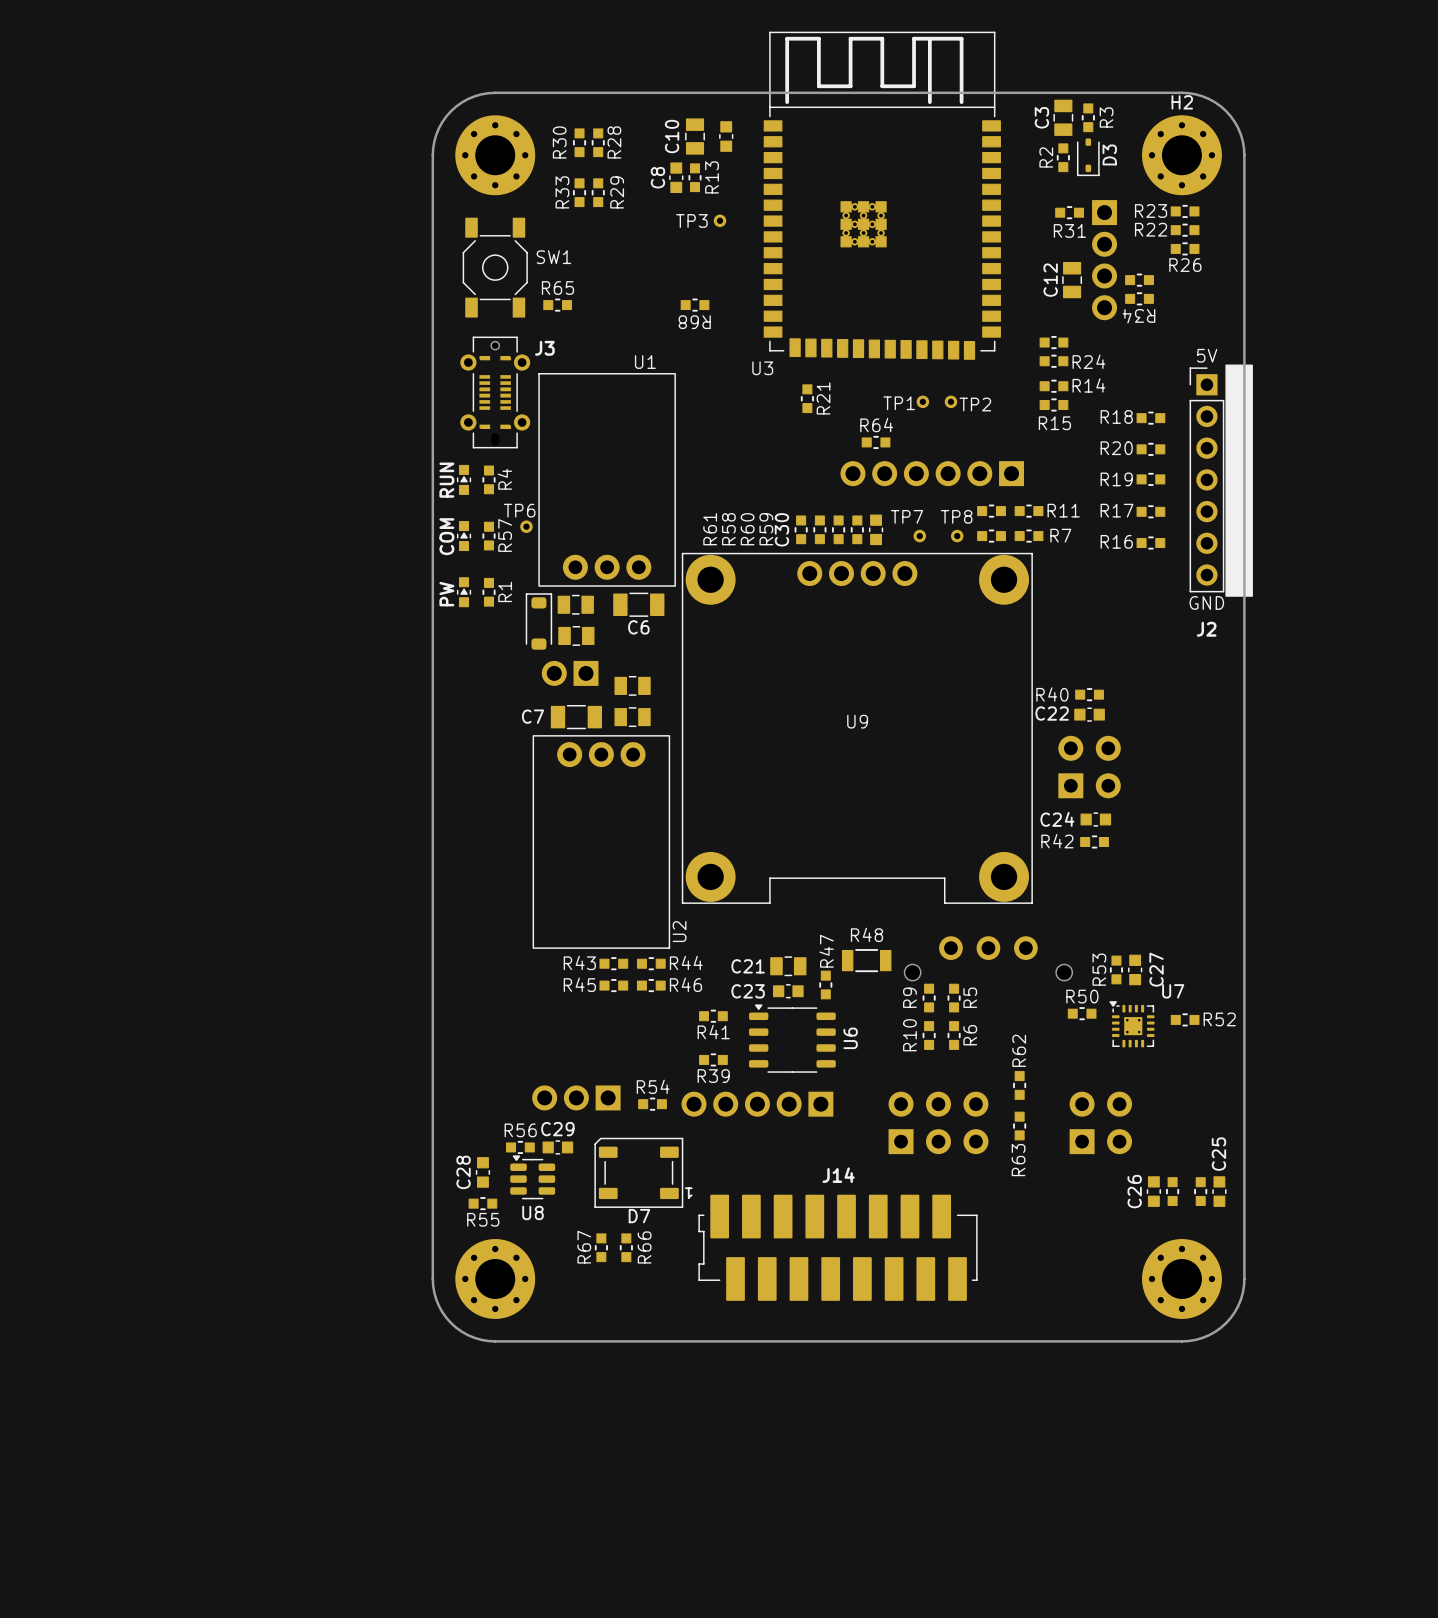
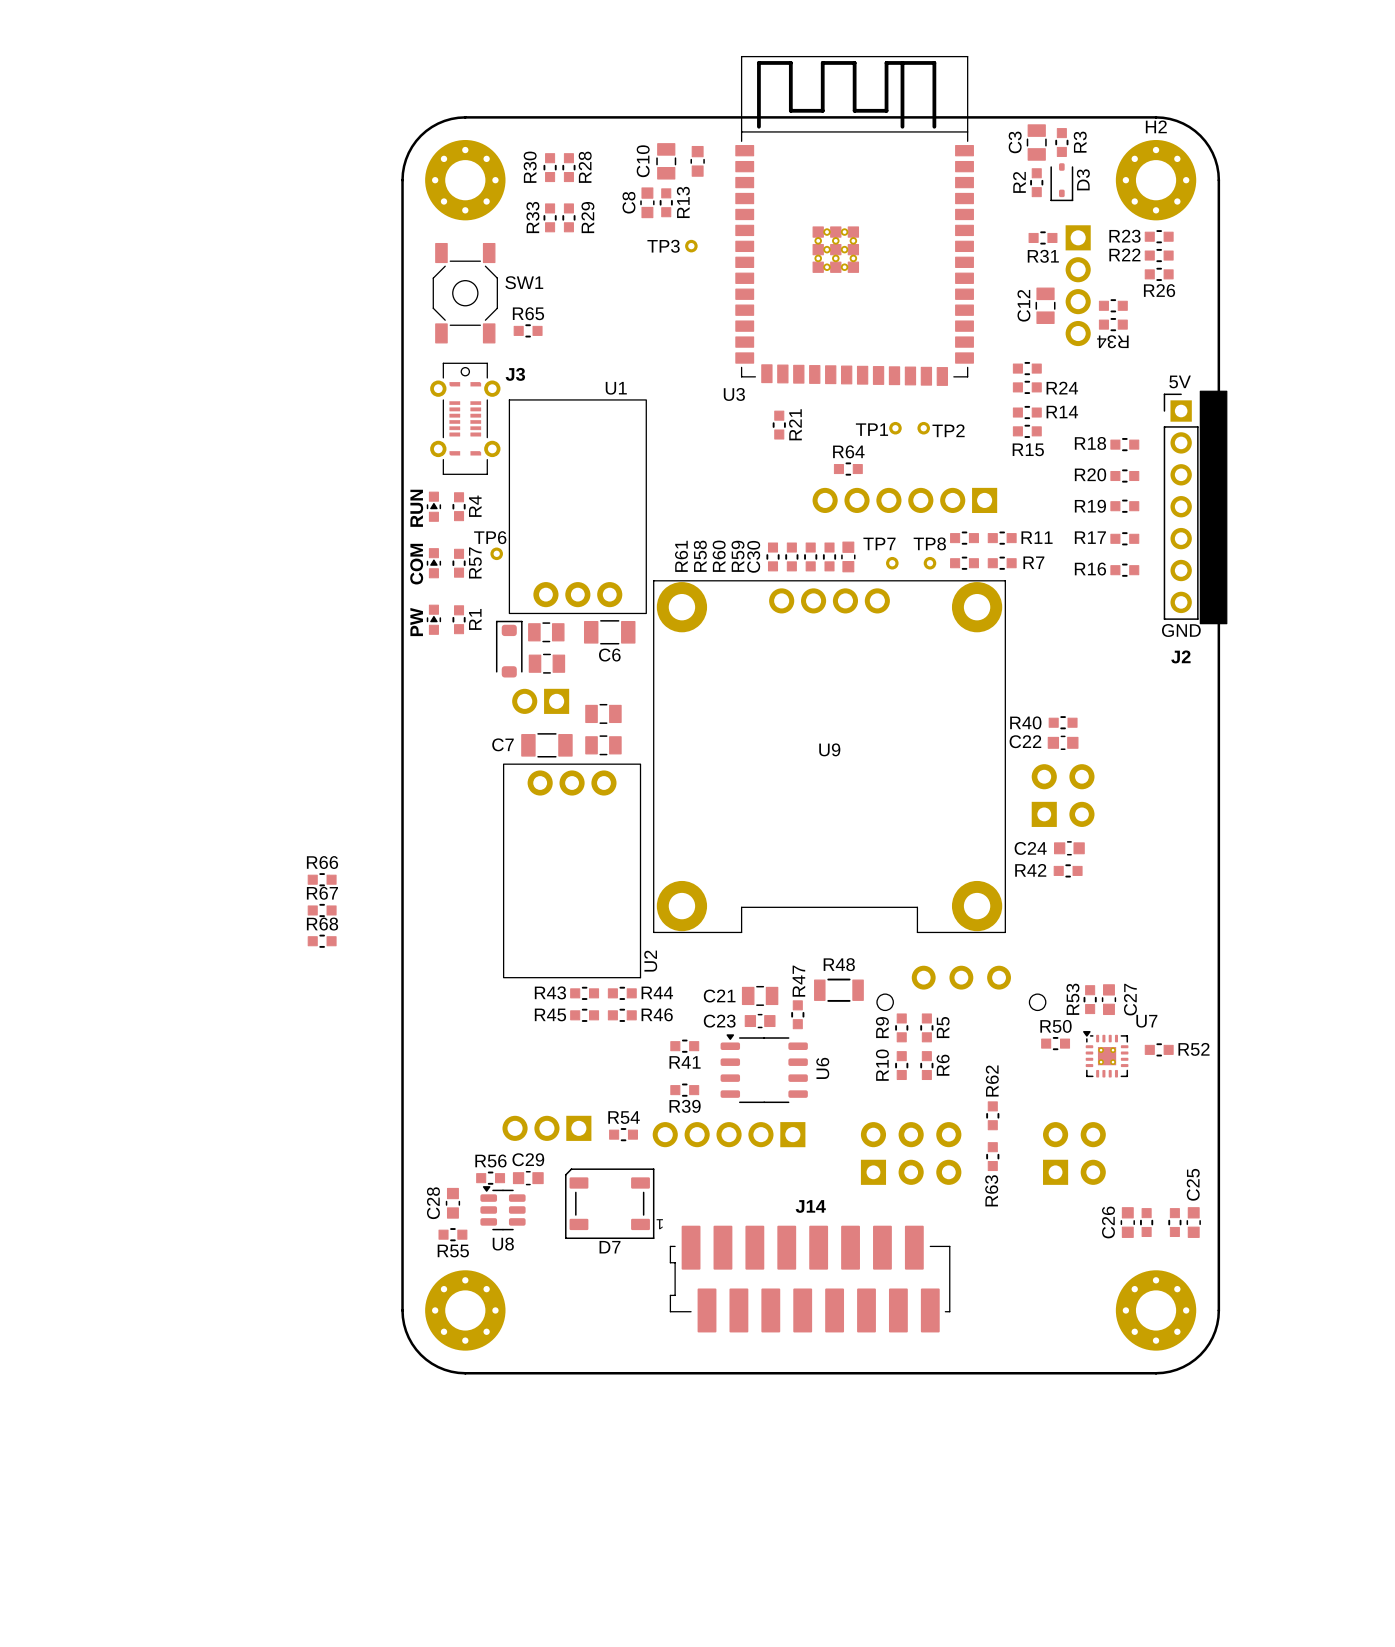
R68 position: (695, 305) -> (322, 941)
R68 name rotation: 0° (694, 322) -> 180° (322, 924)
R67 rotation: 0° (601, 1247) -> 90° clockwise (322, 910)
R67 position: (601, 1247) -> (322, 910)
R66 rotation: 0° (626, 1247) -> 90° clockwise (322, 879)
R66 position: (626, 1247) -> (322, 879)
R66 name position: R66 (644, 1247) -> R66 (322, 862)

